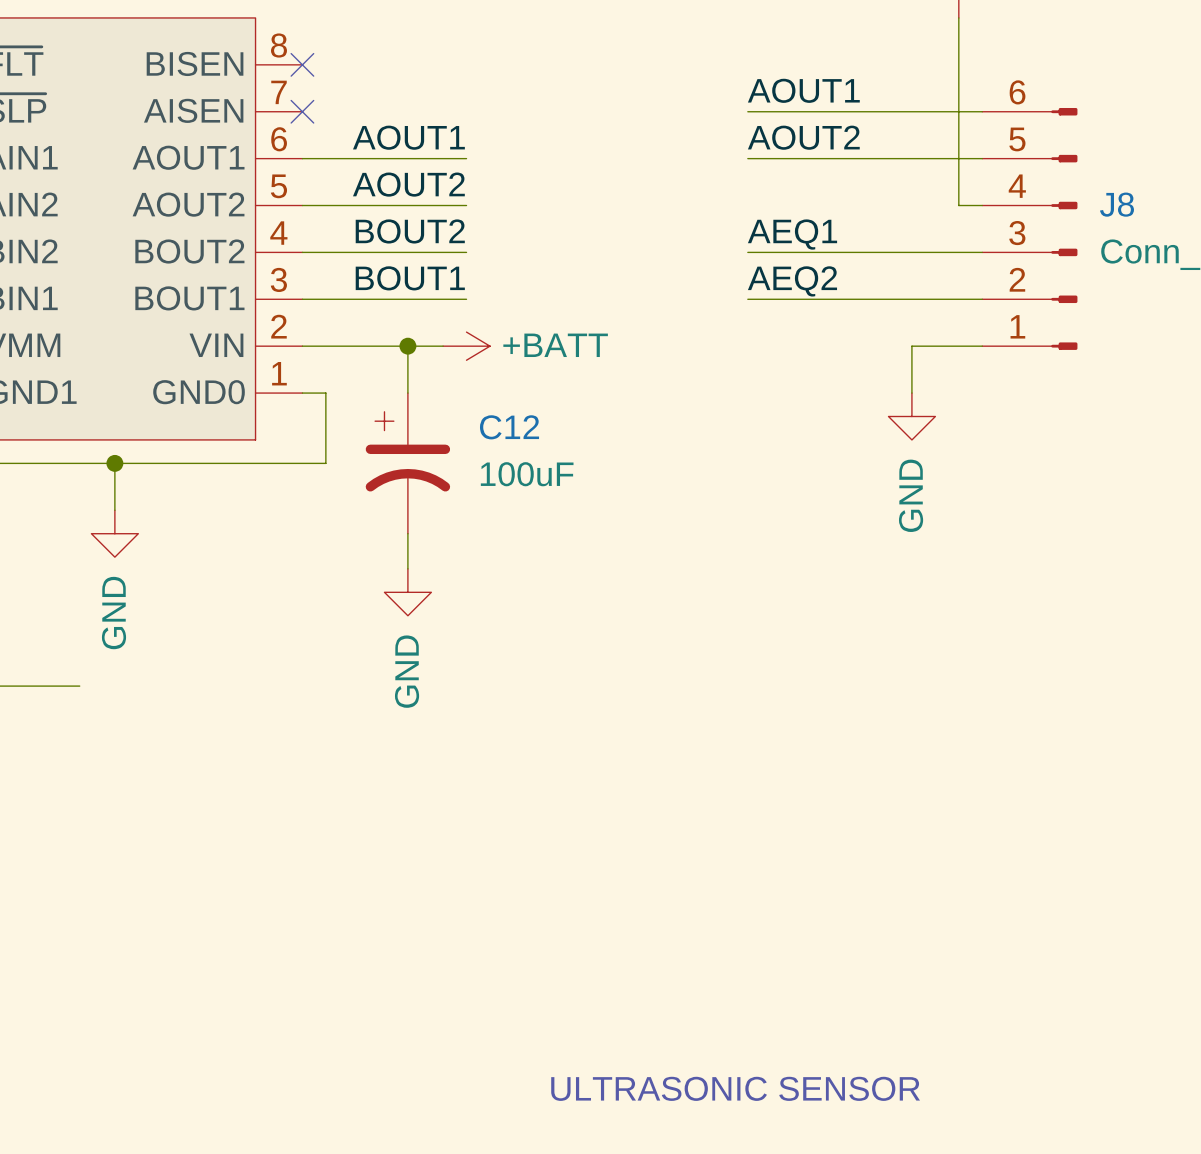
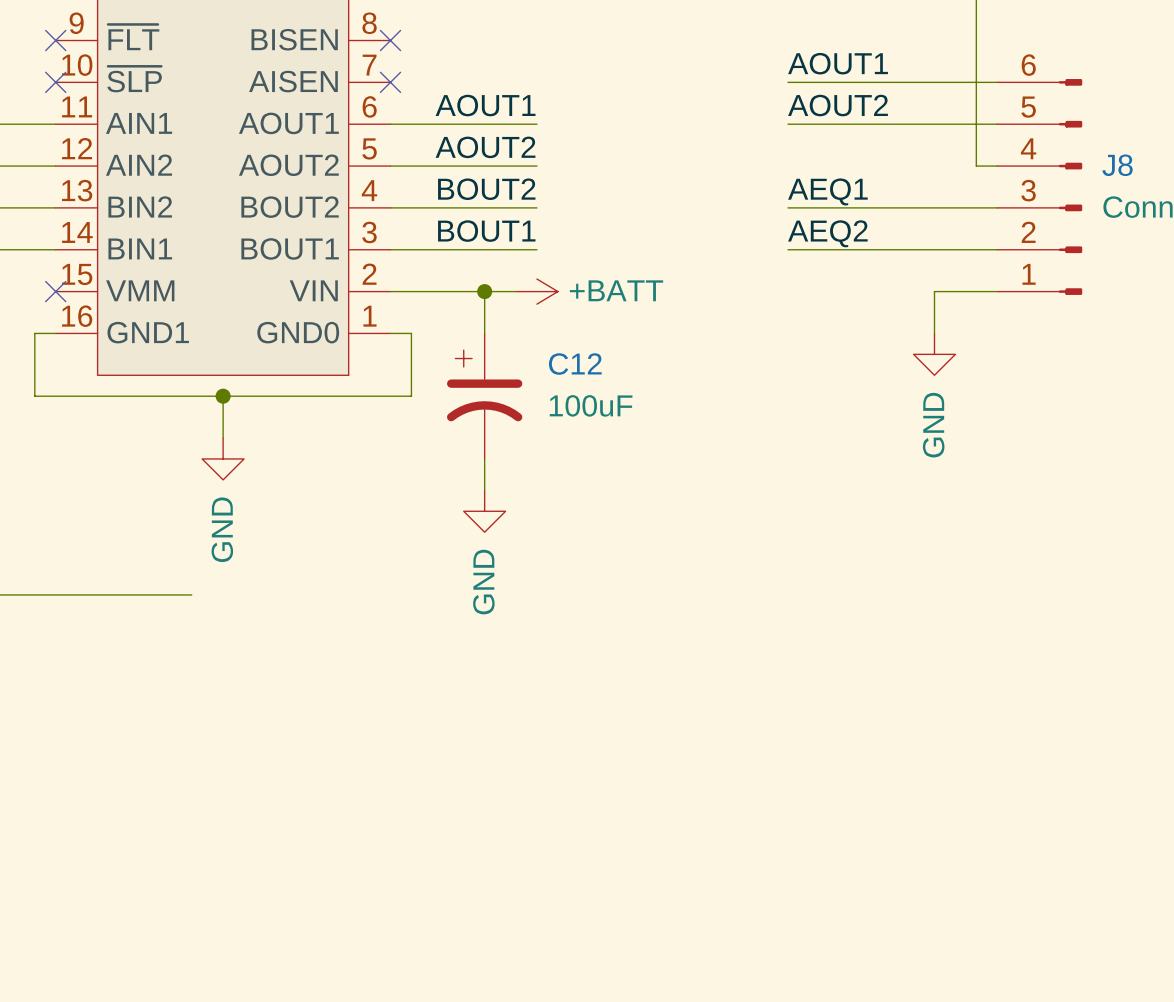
text: ULTRASONIC SENSOR (735, 1088) -> none

